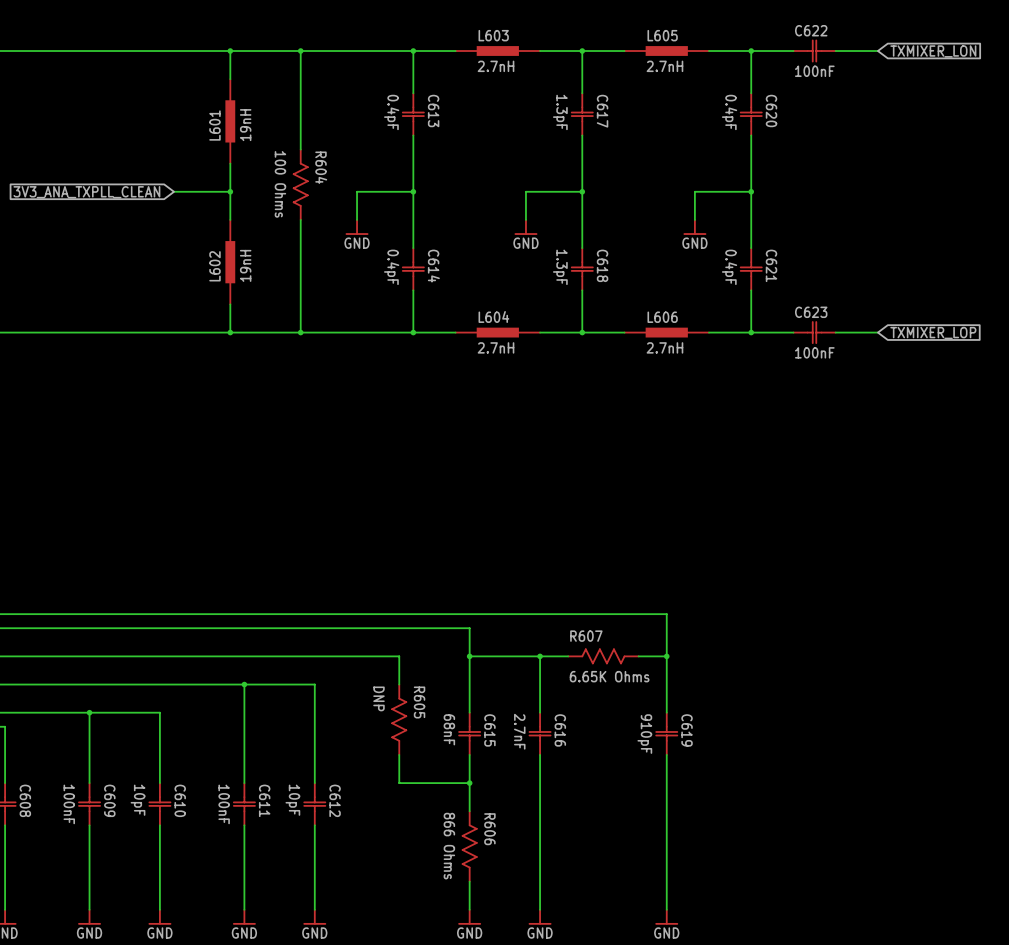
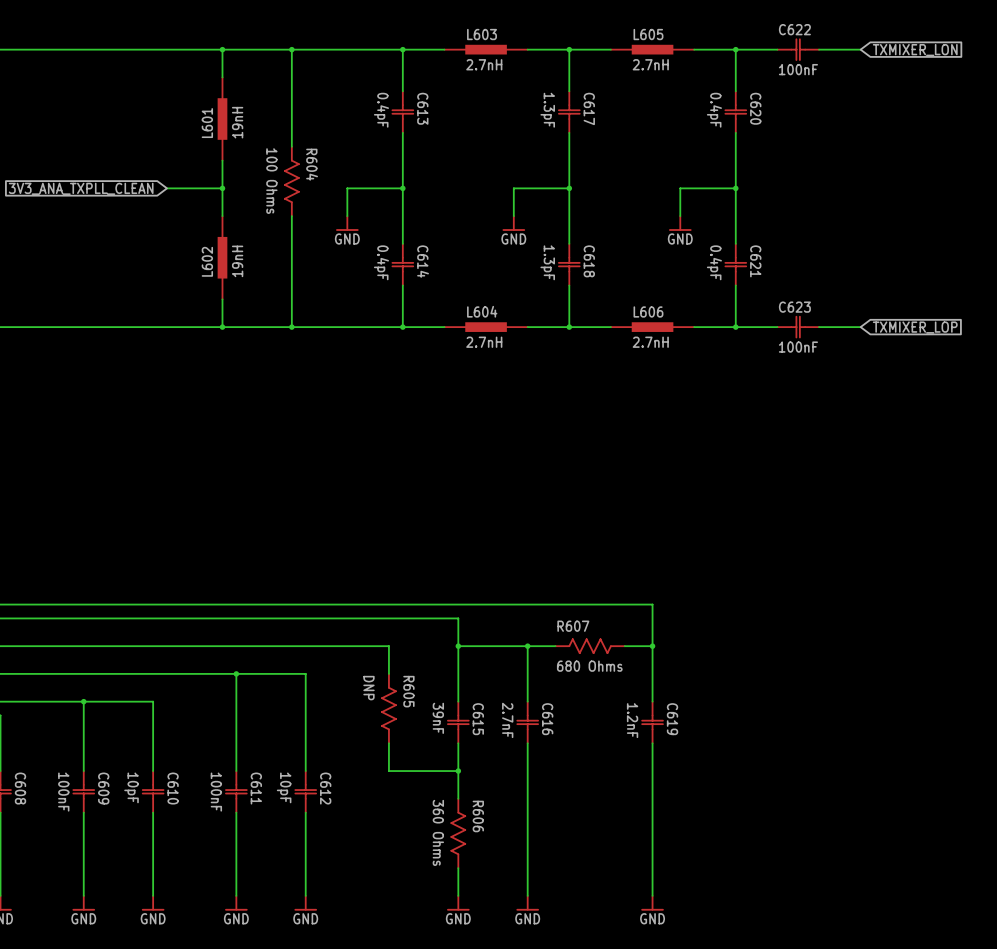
R607 value: 6.65K Ohms (609, 676) -> 680 Ohms (589, 666)
C615 value: 68nF (449, 729) -> 39nF (438, 718)
C619 value: 910pF (644, 734) -> 1.2nF (632, 720)
R606 value: 866 Ohms (449, 846) -> 360 Ohms (438, 832)

